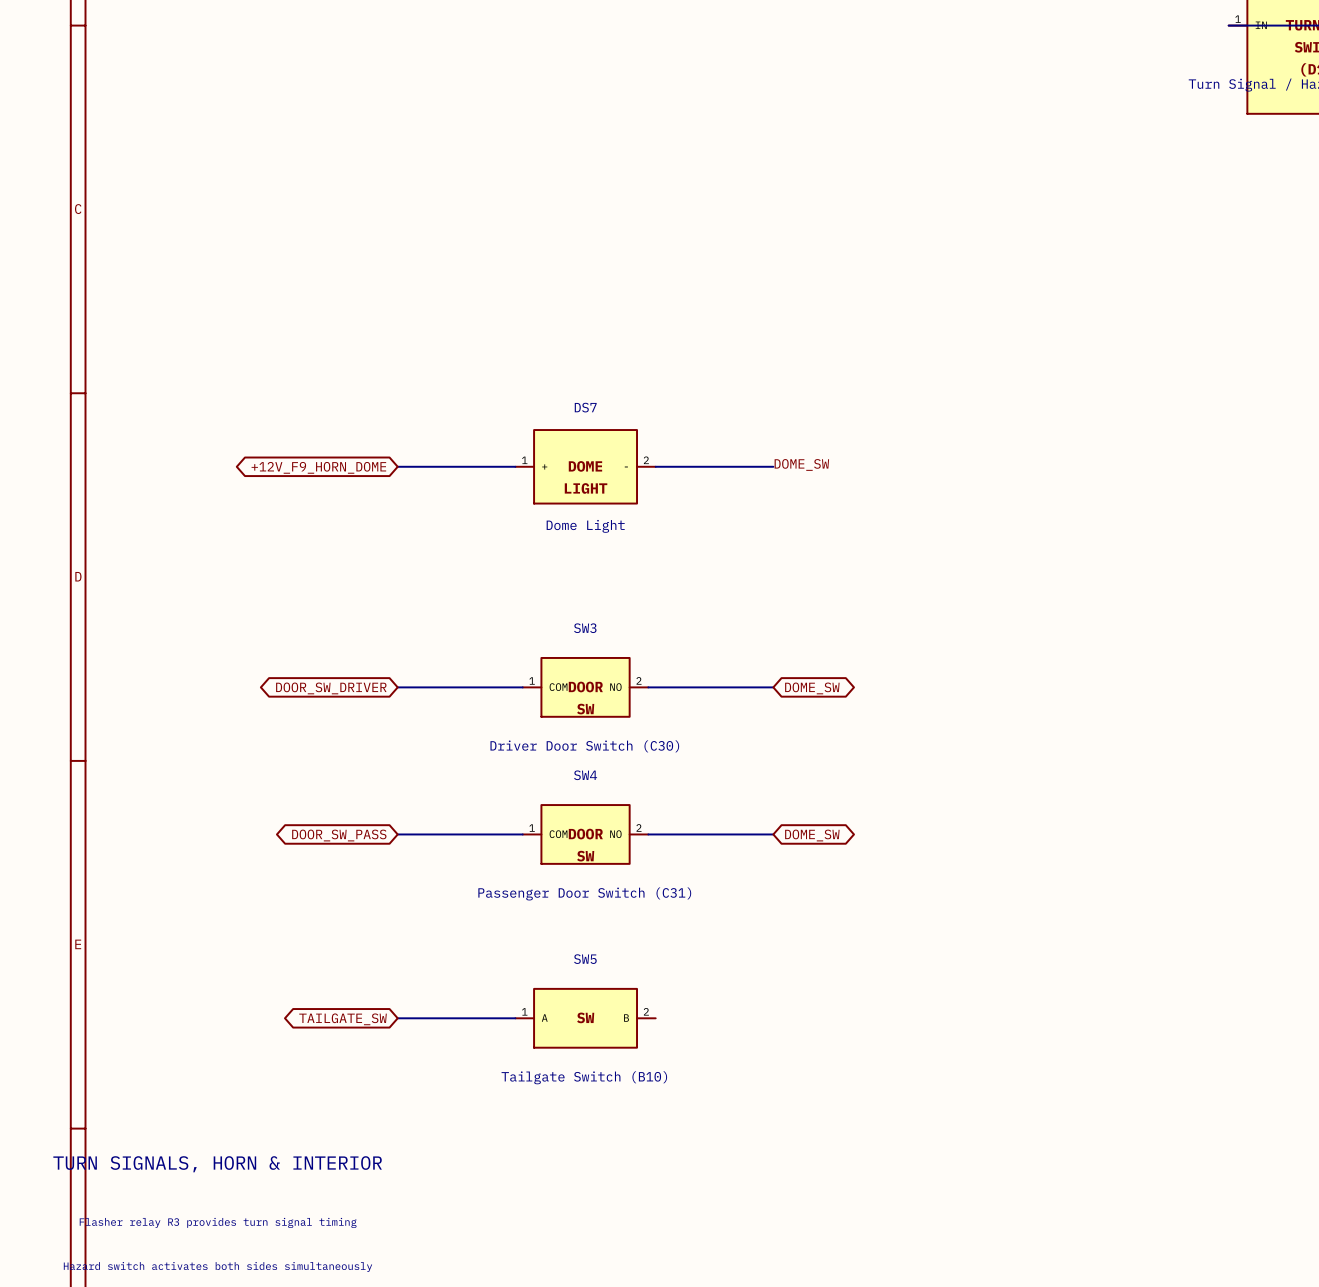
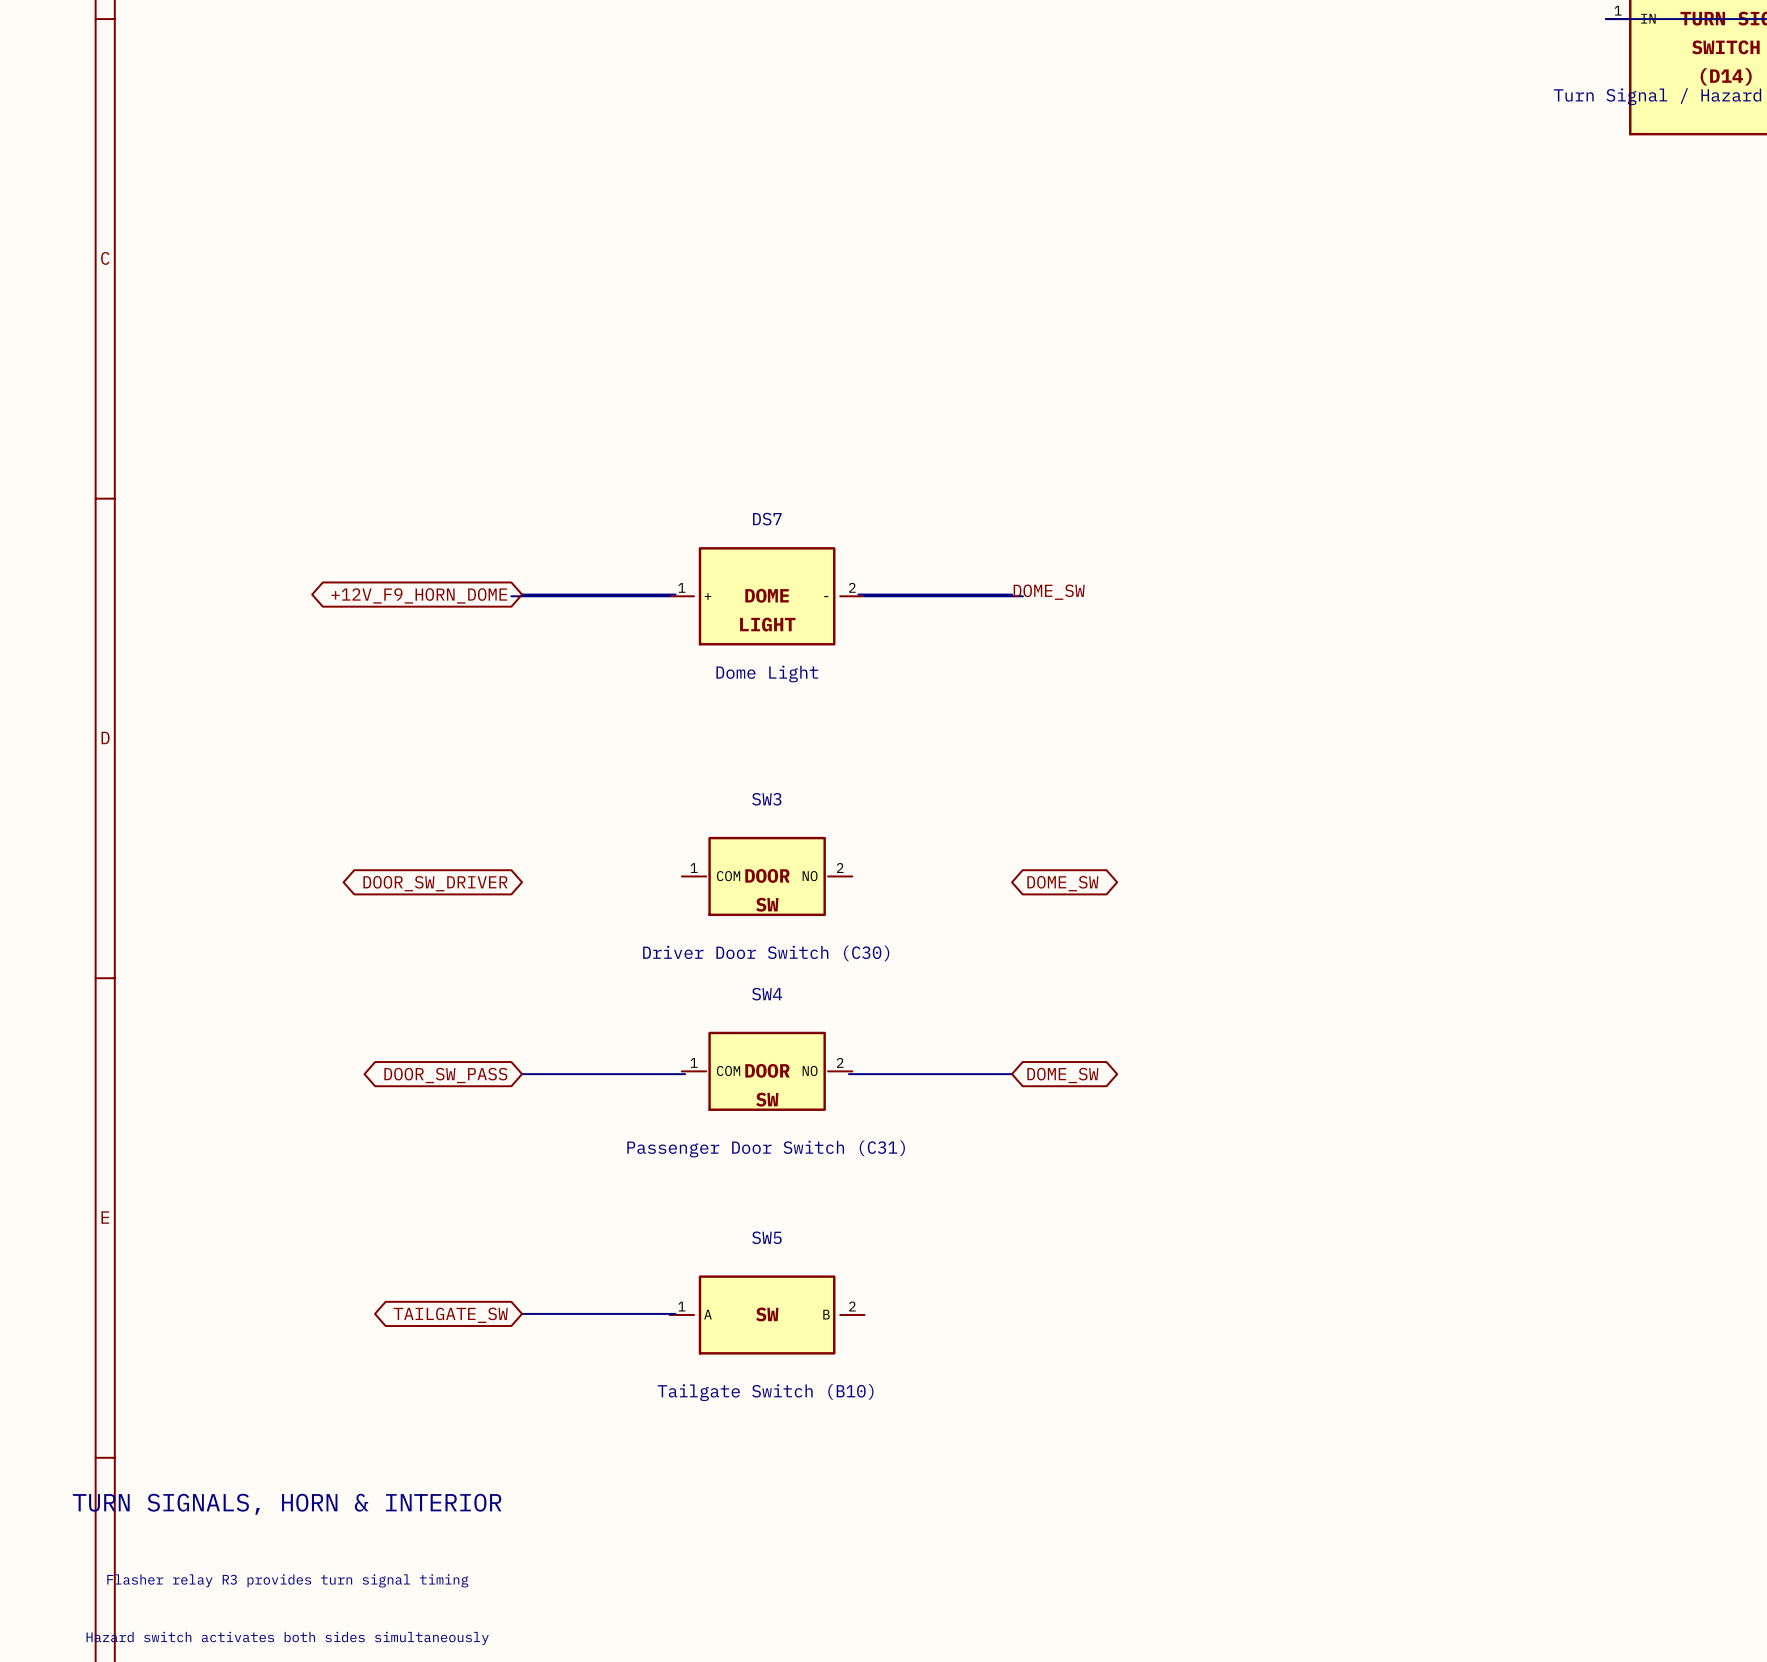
DS7 symbol: [515, 429, 656, 505] -> [669, 547, 865, 646]
wire: none -> (511, 596) (669, 596)
wire: none -> (864, 596) (1022, 596)
SW3 symbol: [522, 657, 649, 718] -> [681, 836, 853, 917]
wire: (397, 687) (522, 687) -> none
wire: (648, 687) (773, 687) -> none
SW4 symbol: [522, 804, 649, 865] -> [681, 1031, 853, 1111]
SW5 symbol: [515, 987, 656, 1049] -> [669, 1275, 865, 1355]

